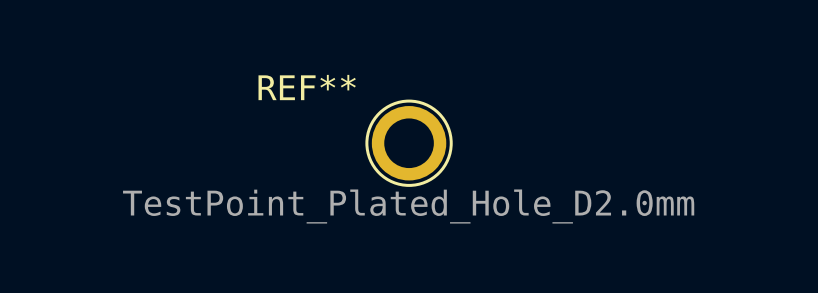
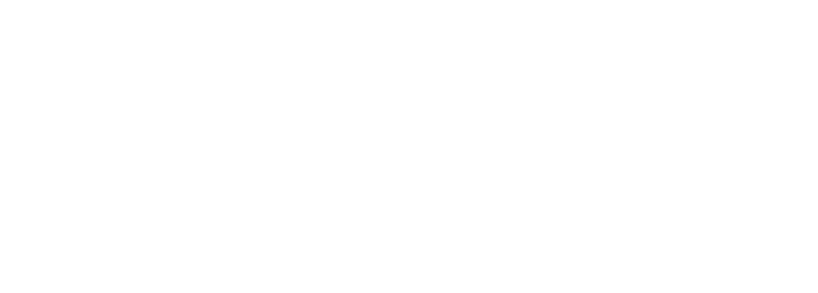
REF**: TestPoint_Plated_Hole_D2.0mm (409, 143) -> none

